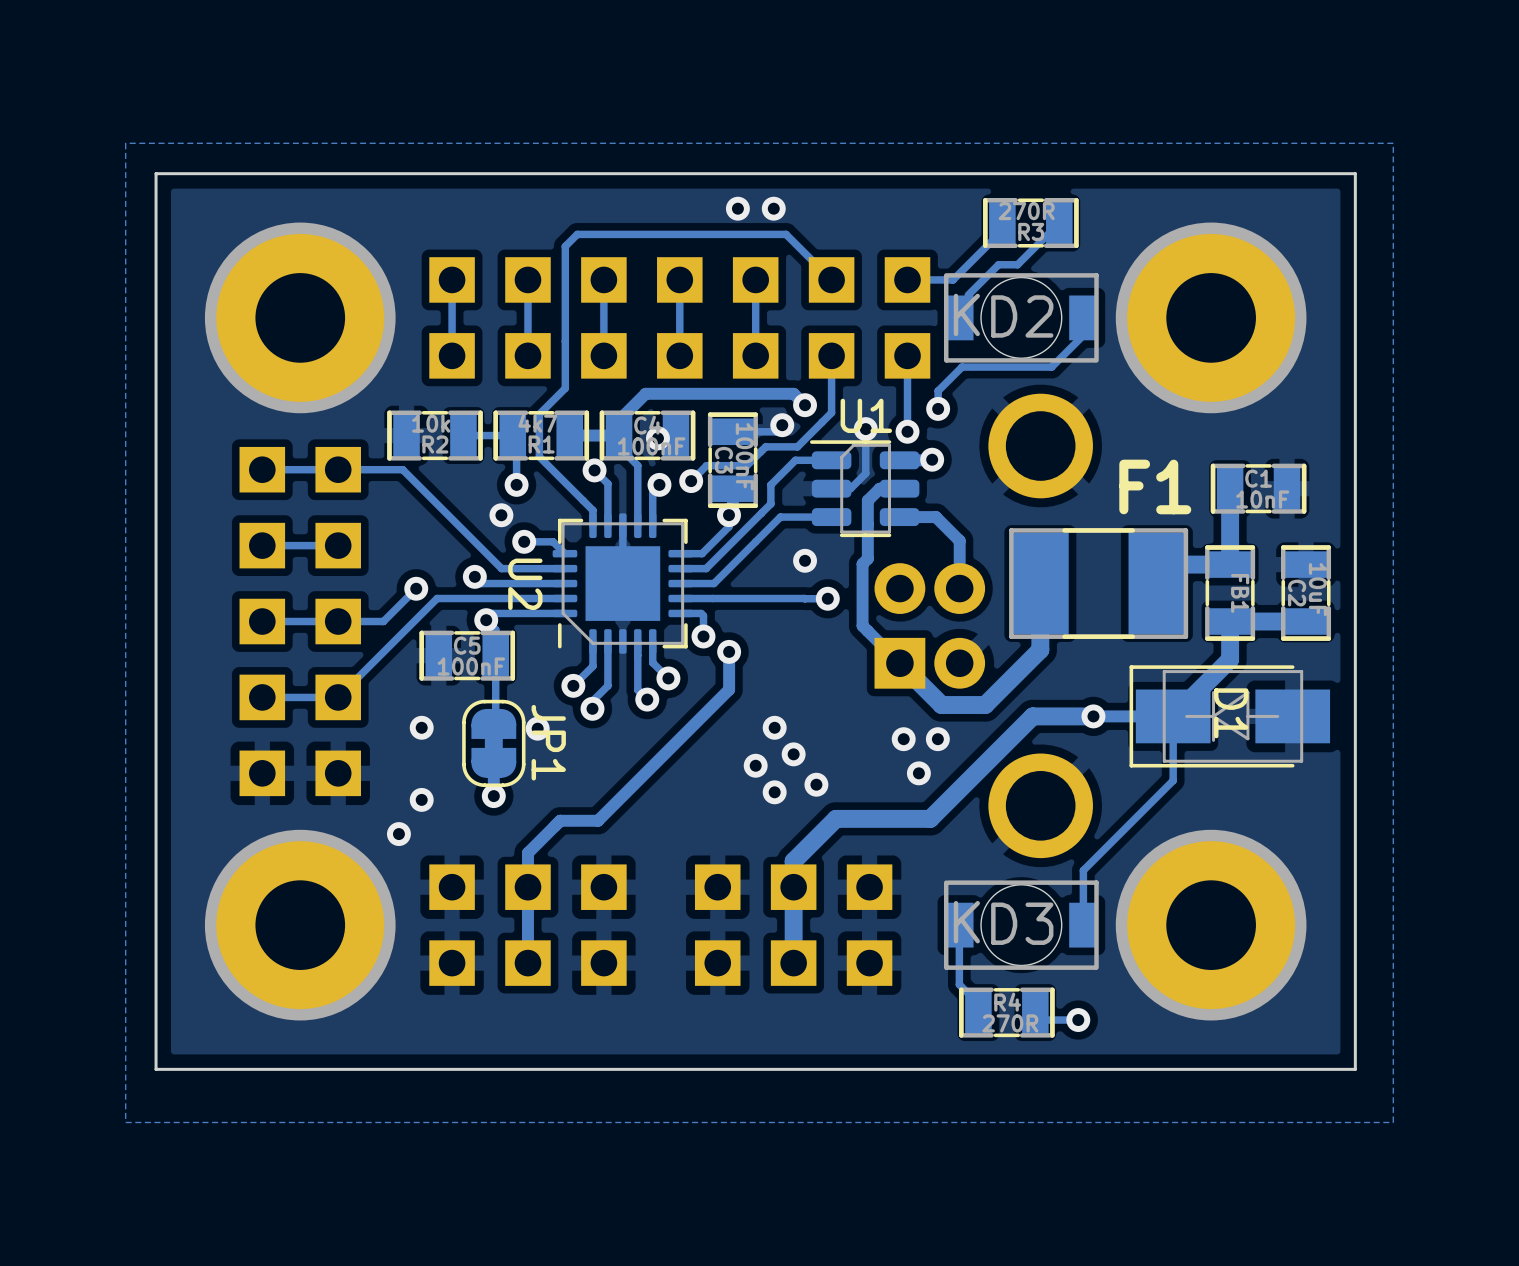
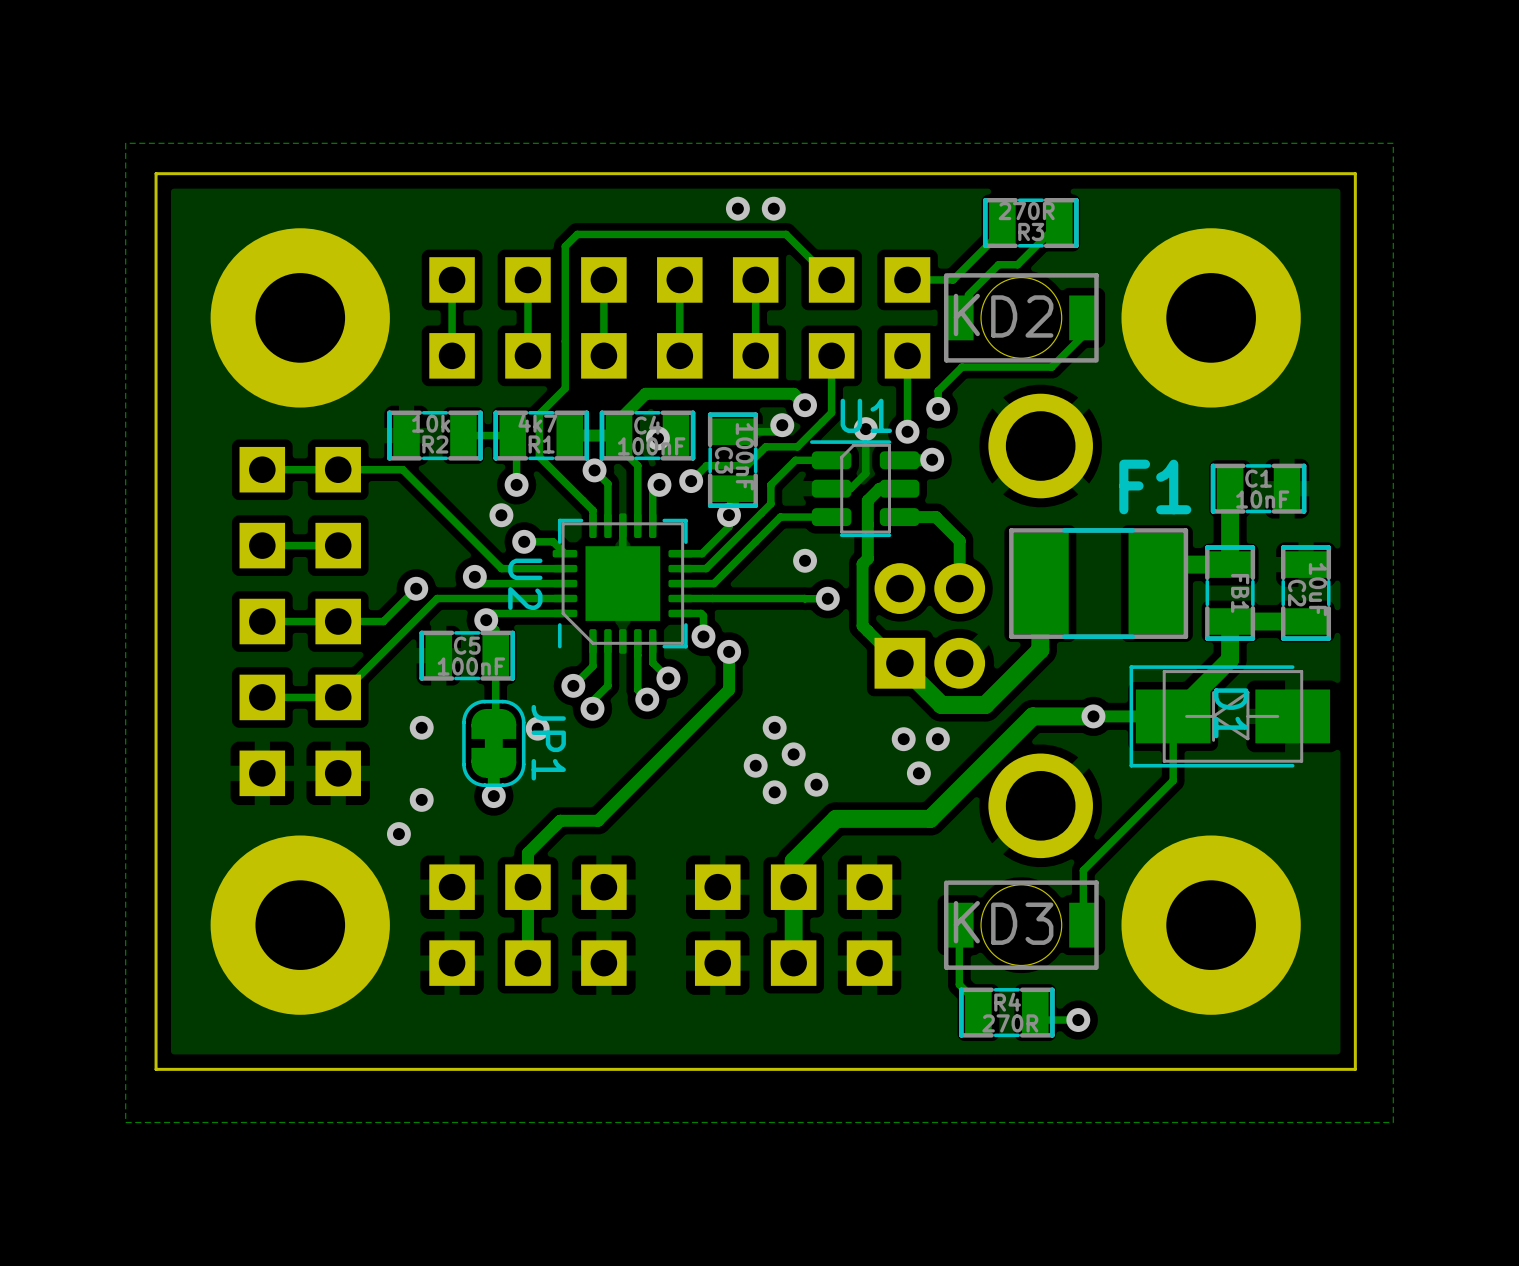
part side: bottom (300, 317) -> top (300, 317)
part side: bottom (1211, 317) -> top (1211, 317)
part side: bottom (300, 925) -> top (300, 925)
part side: bottom (1211, 925) -> top (1211, 925)

